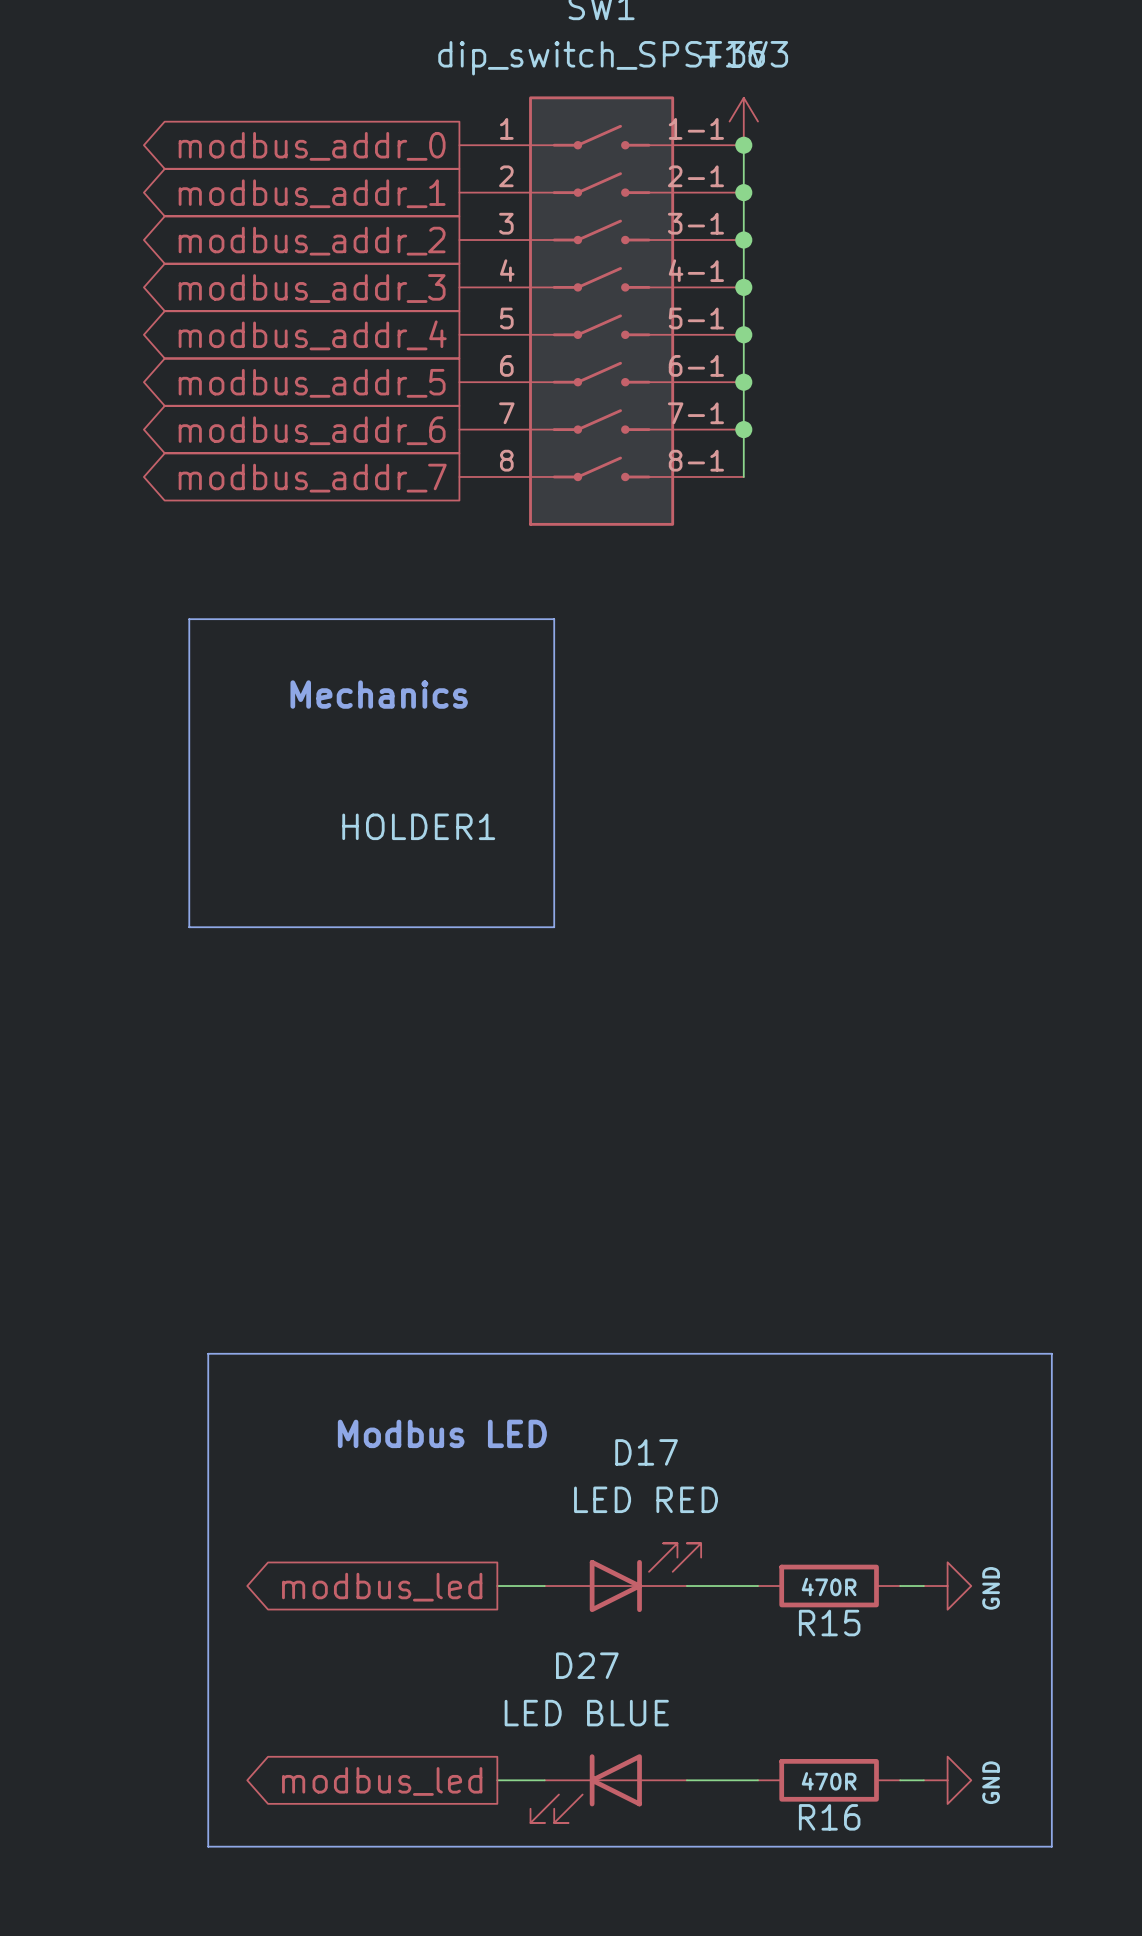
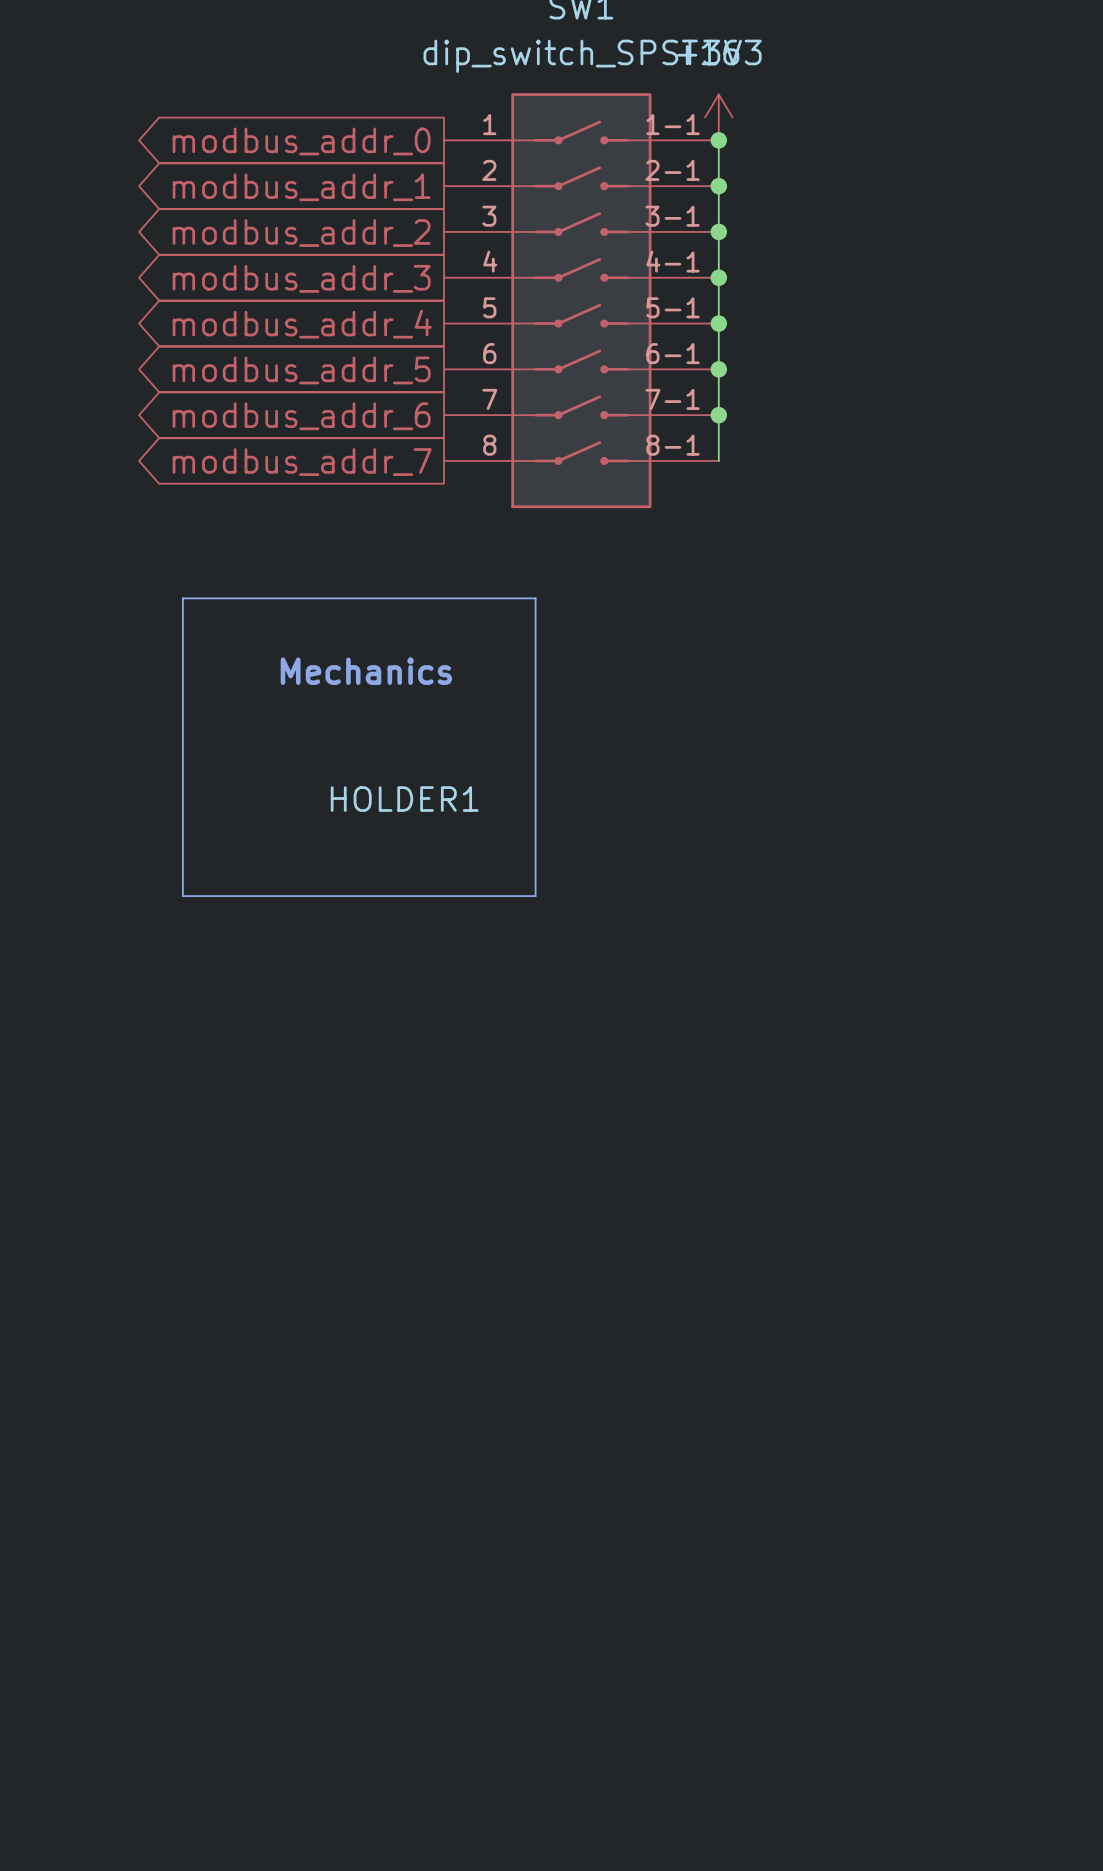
line: (208, 1353) (1051, 1353) (1051, 1846) (208, 1846) (208, 1353) -> none
text: Modbus LED (442, 1433) -> none
D17: LED RED (622, 1577) -> none
wire: (497, 1586) (544, 1586) -> none
wire: (686, 1586) (758, 1586) -> none
R15: 470R (829, 1586) -> none
wire: (900, 1586) (923, 1586) -> none
power symbol: GND (947, 1586) -> none
global label: modbus_led (382, 1587) -> none
wire: (497, 1780) (544, 1780) -> none
wire: (686, 1780) (758, 1780) -> none
R16: 470R (829, 1780) -> none
wire: (900, 1780) (923, 1780) -> none
power symbol: GND (947, 1780) -> none
global label: modbus_led (382, 1781) -> none
D27: LED BLUE (608, 1788) -> none

